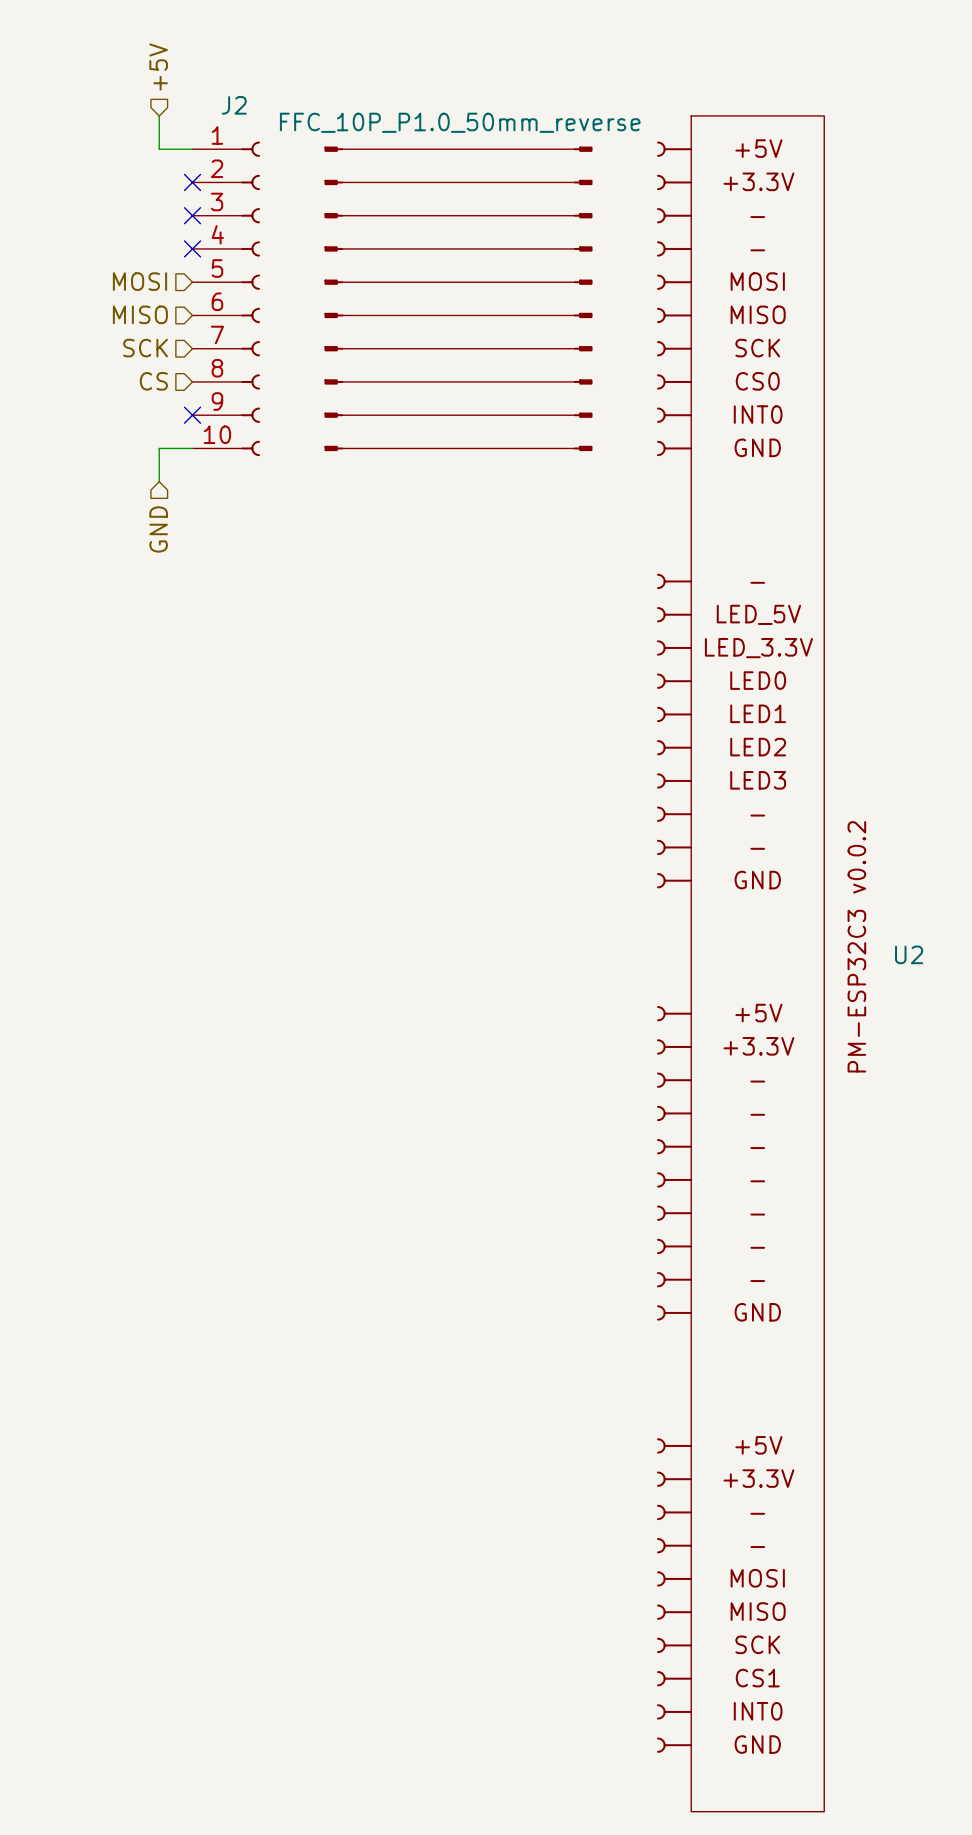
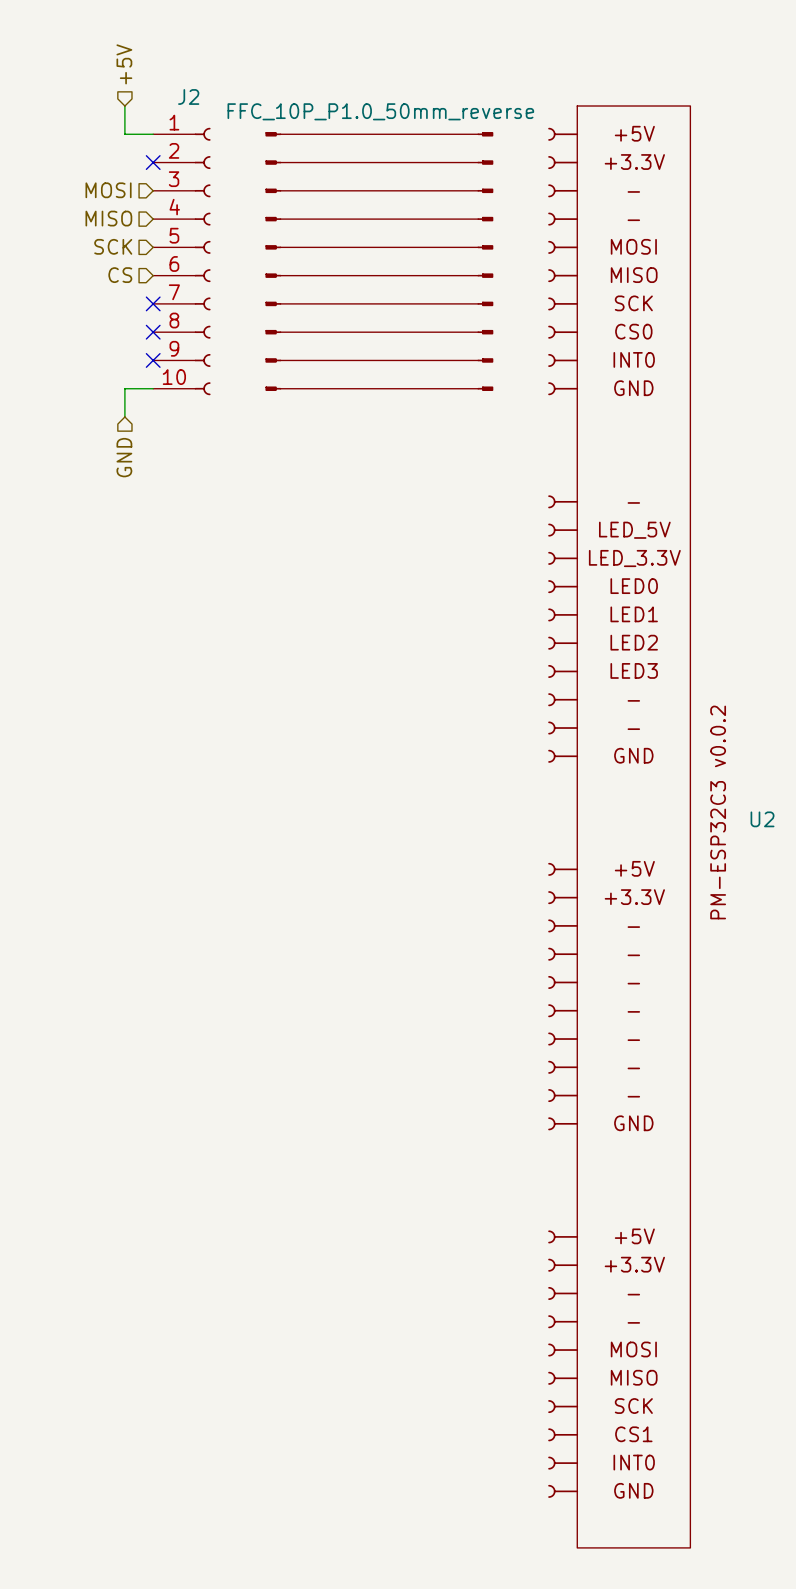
hierarchical label: none -> MOSI (108, 190)
no-connect mark: (192, 215) -> none
hierarchical label: none -> MISO (108, 218)
no-connect mark: (192, 248) -> none
hierarchical label: MOSI (140, 281) -> SCK (113, 246)
hierarchical label: MISO (140, 314) -> CS (120, 275)
hierarchical label: SCK (145, 348) -> none
no-connect mark: none -> (153, 303)
hierarchical label: CS (153, 381) -> none
no-connect mark: none -> (153, 332)

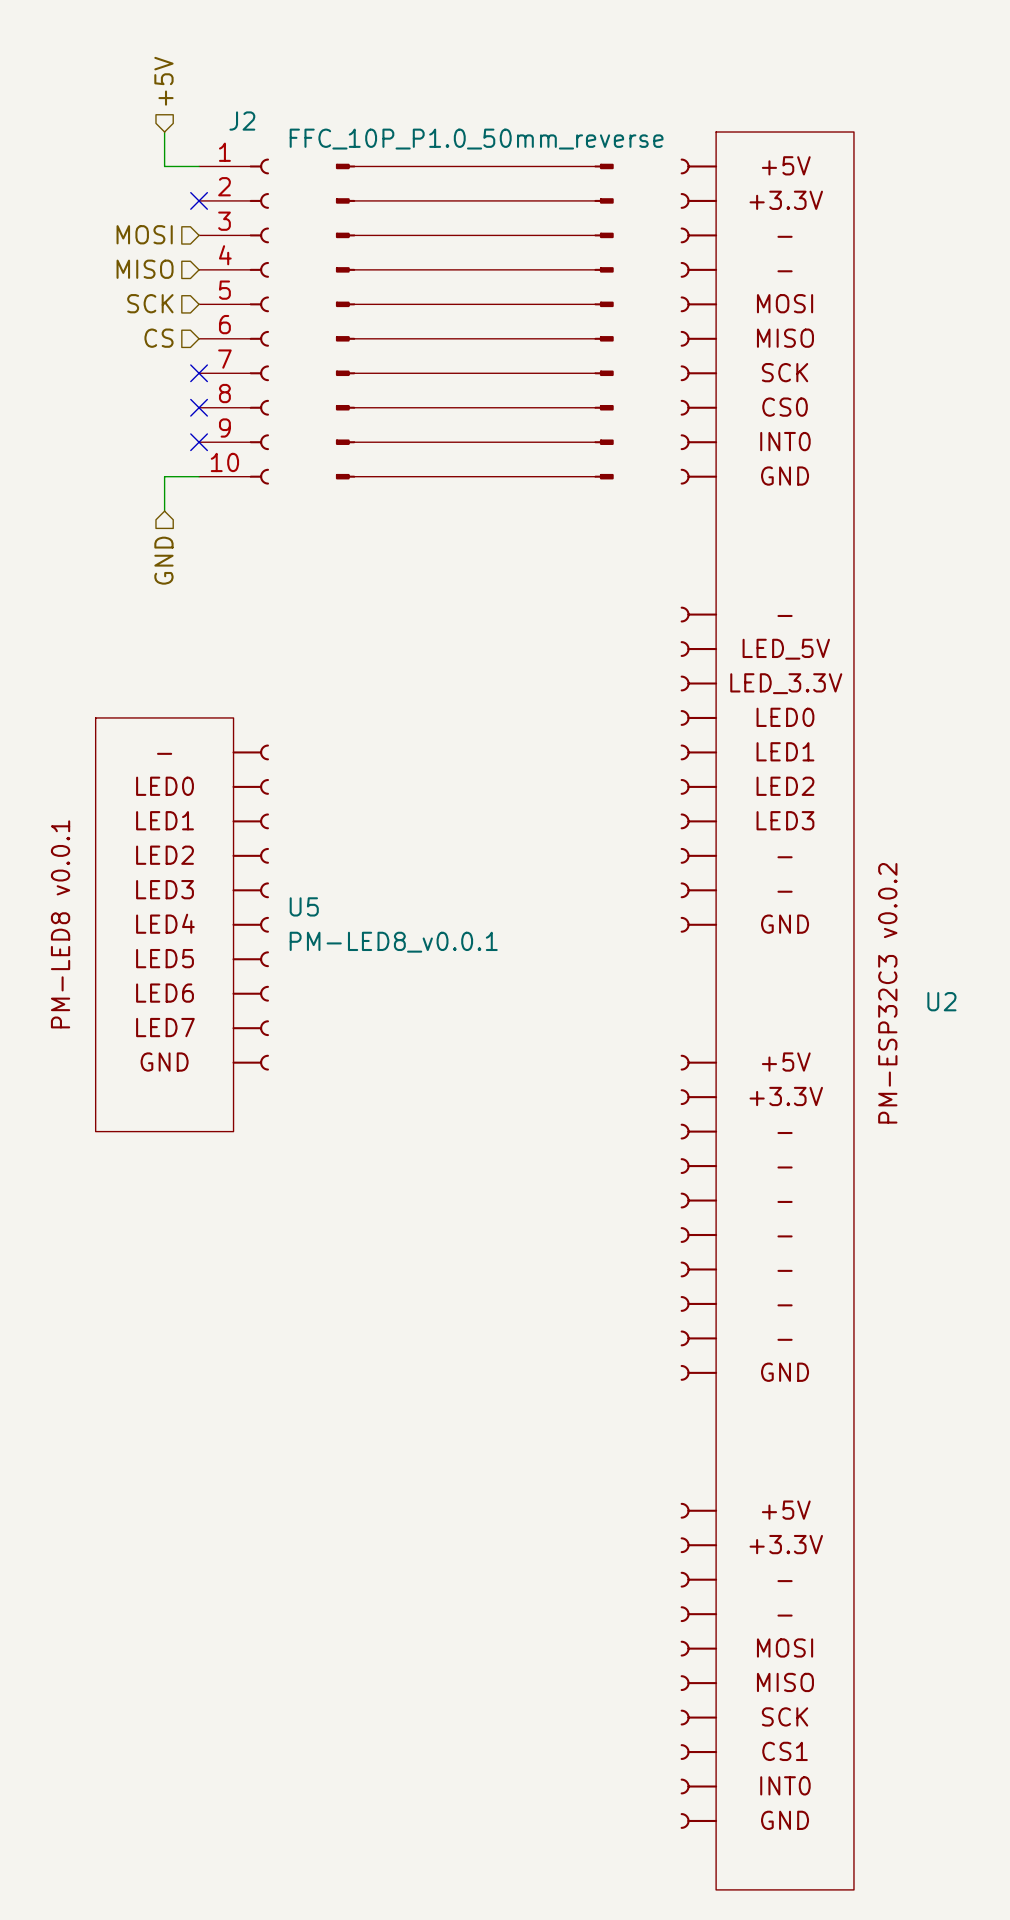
U5: none -> PM-LED8_v0.0.1 (182, 924)

